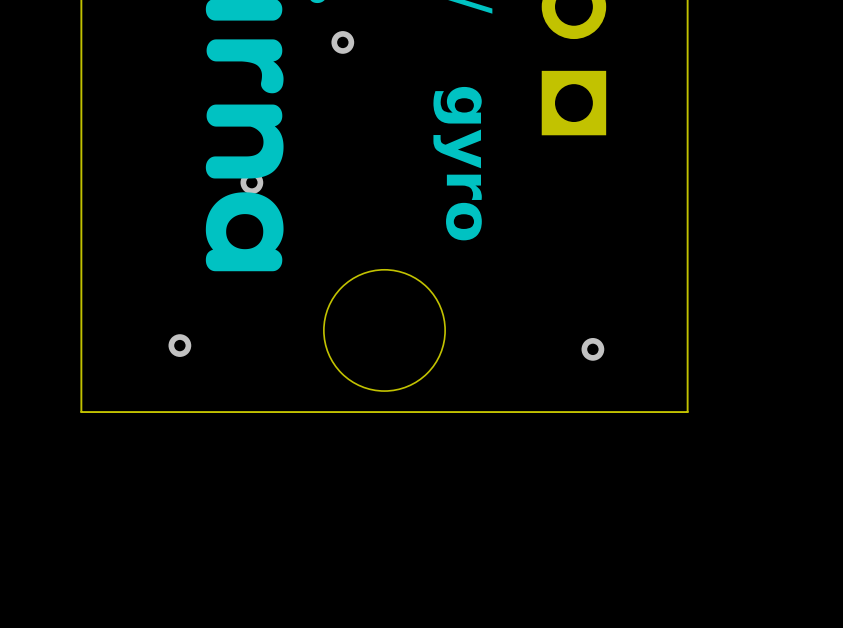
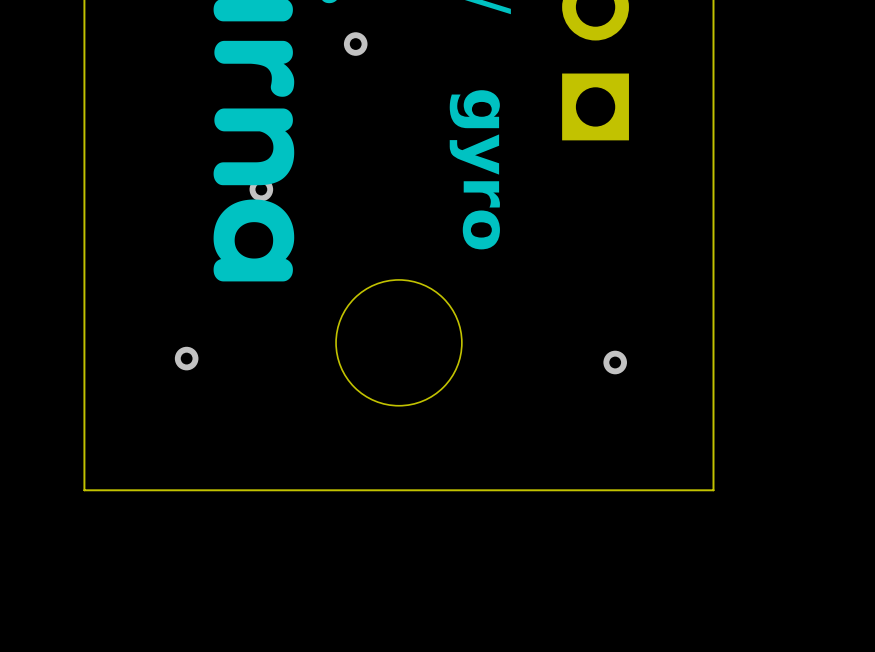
board edge: (687, 412) (81, 412) -> (713, 427) (713, 490) (84, 490) (84, 427)

